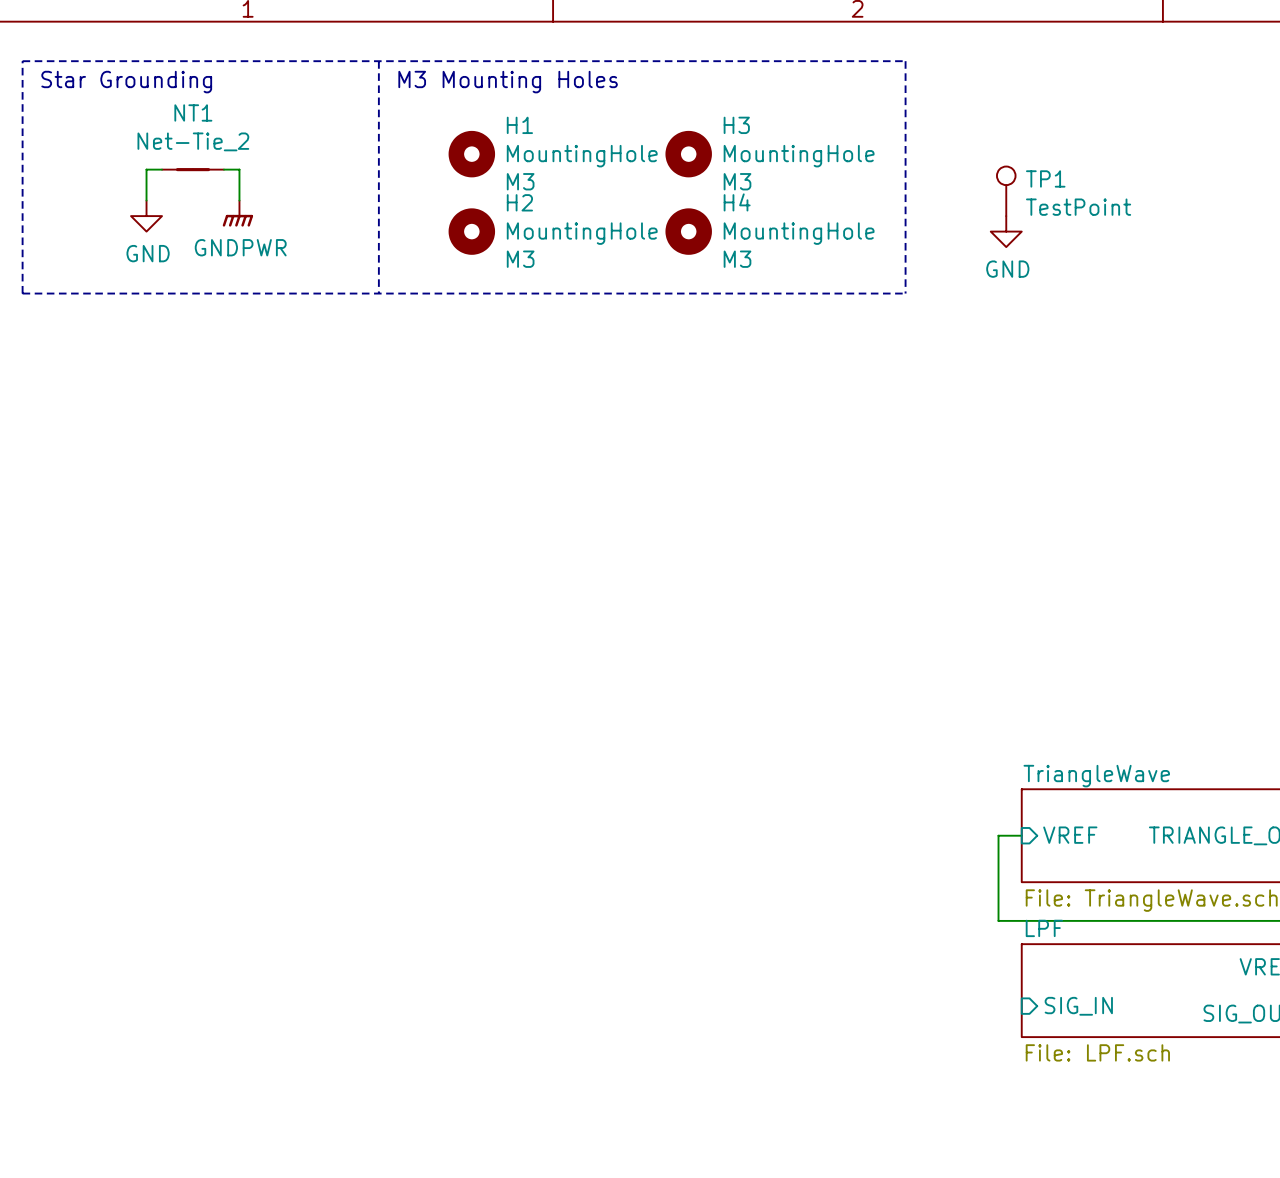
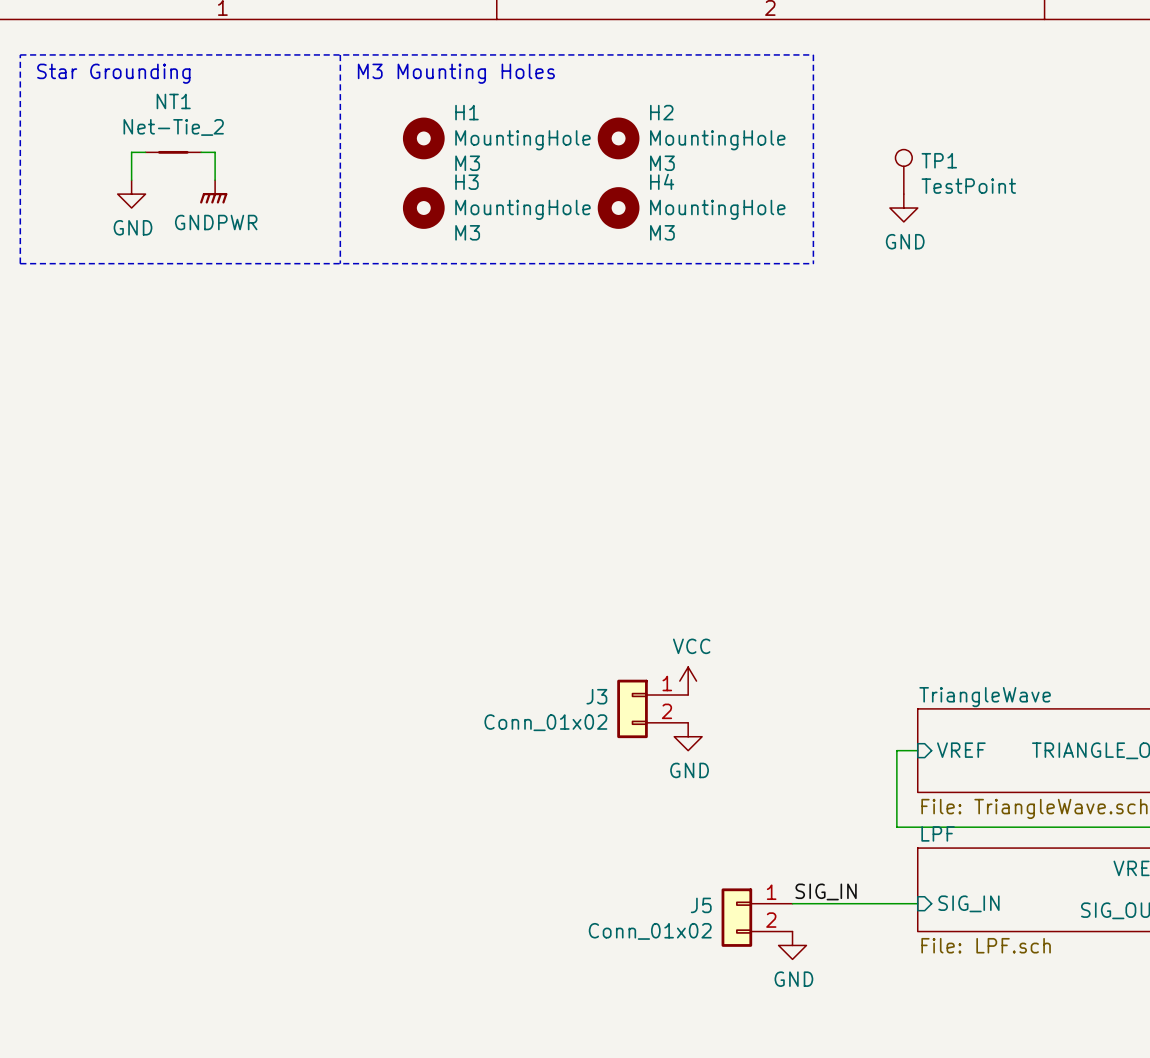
H3 name: H3 (736, 125) -> H2 (661, 112)
H2 name: H2 (519, 202) -> H3 (466, 182)
power symbol: none -> VCC (688, 681)
J3: none -> Conn_01x02 (652, 708)
power symbol: none -> GND (688, 736)
label: none -> SIG_IN (826, 891)
wire: none -> (792, 903) (917, 903)
J5: none -> Conn_01x02 (757, 917)
power symbol: none -> GND (792, 945)

